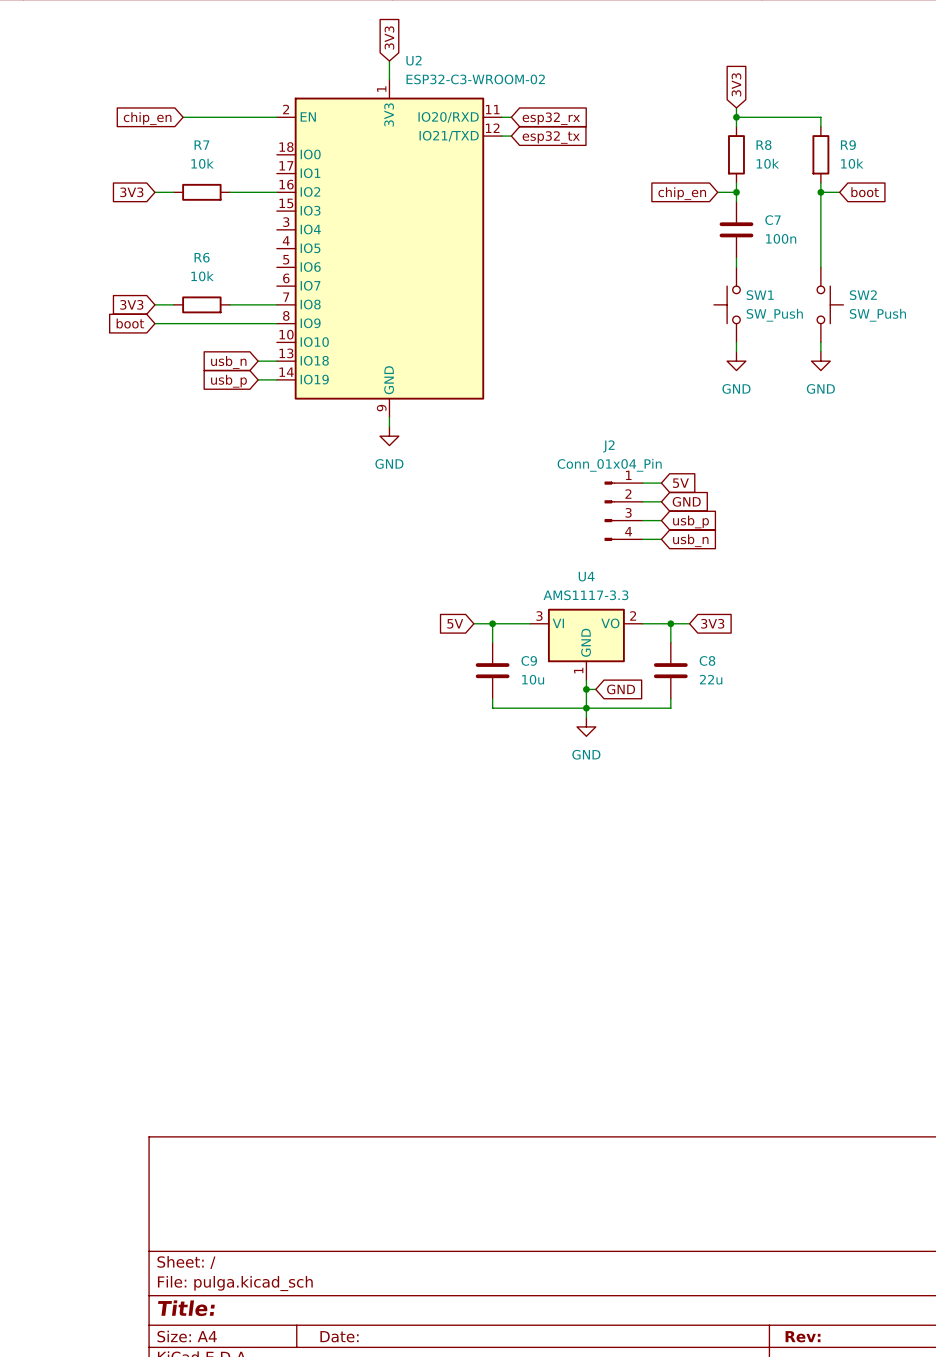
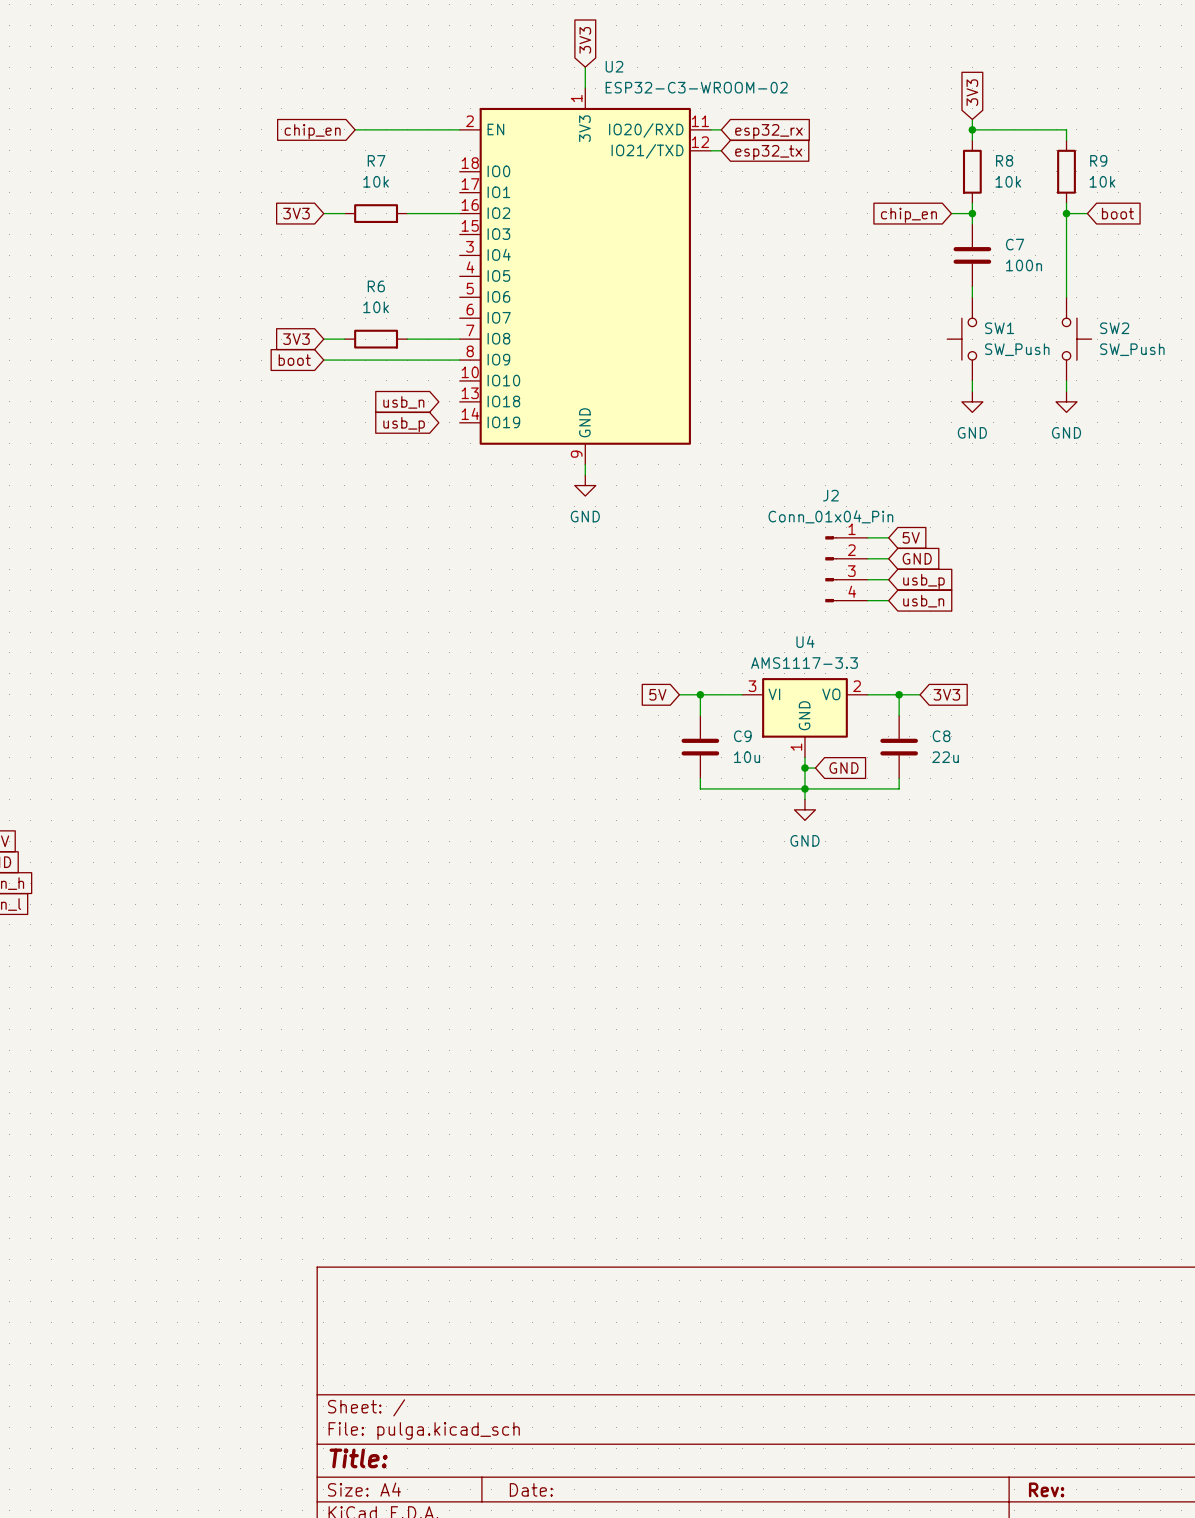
wire: (258, 361) (276, 361) -> none
wire: (258, 379) (276, 379) -> none

